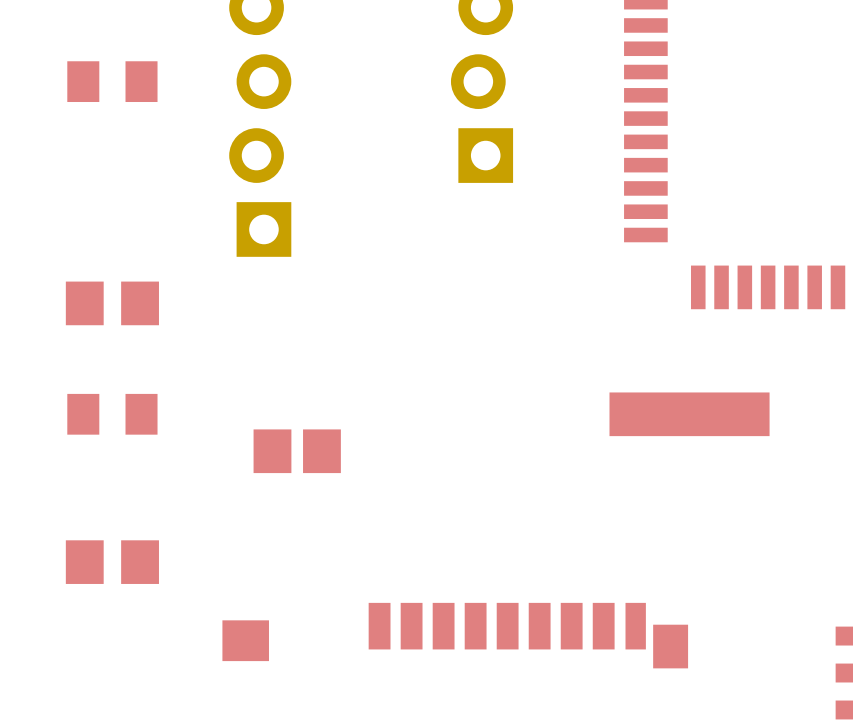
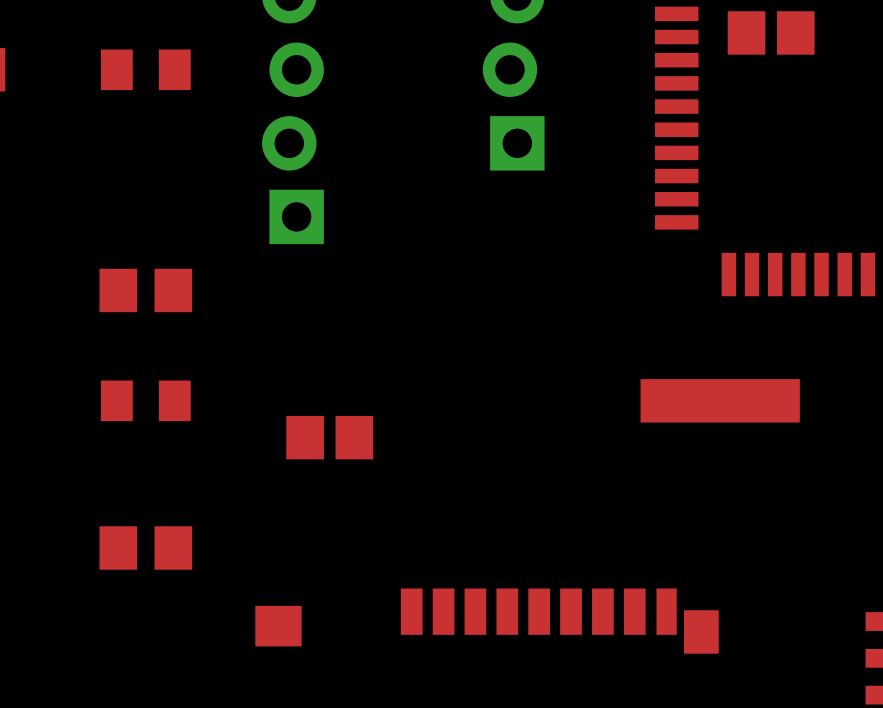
part: none -> (771, 32)

